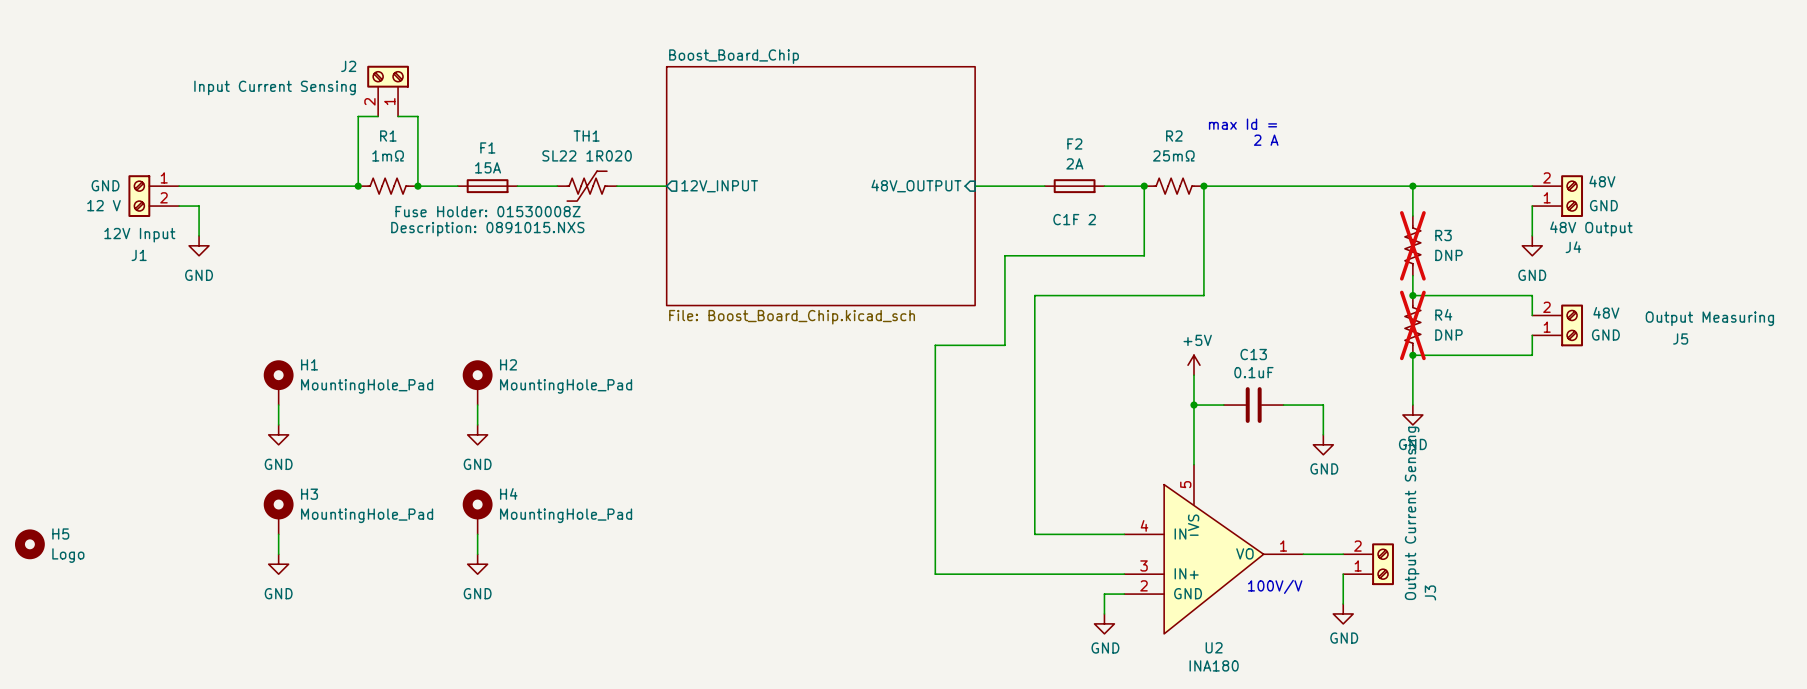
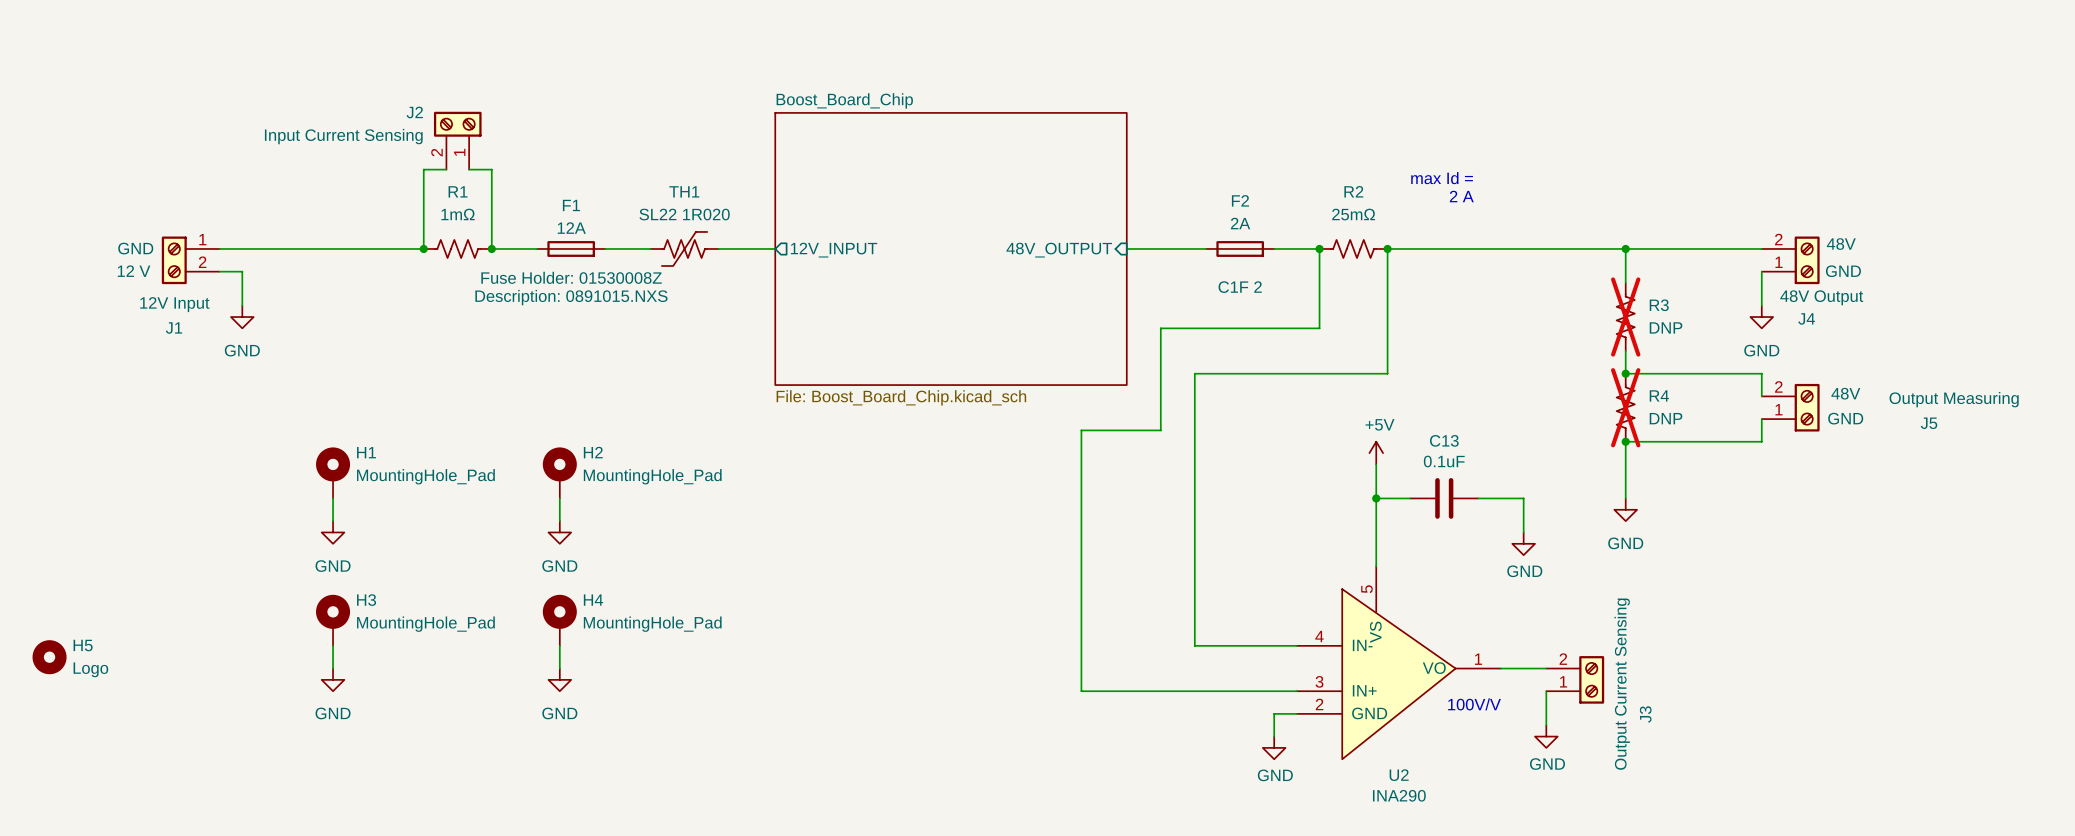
F1 value: 15A (488, 167) -> 12A (571, 228)
J3 value position: Output Current Sensing (1412, 513) -> Output Current Sensing (1622, 684)
U2 value: INA180 (1214, 665) -> INA290 (1399, 795)

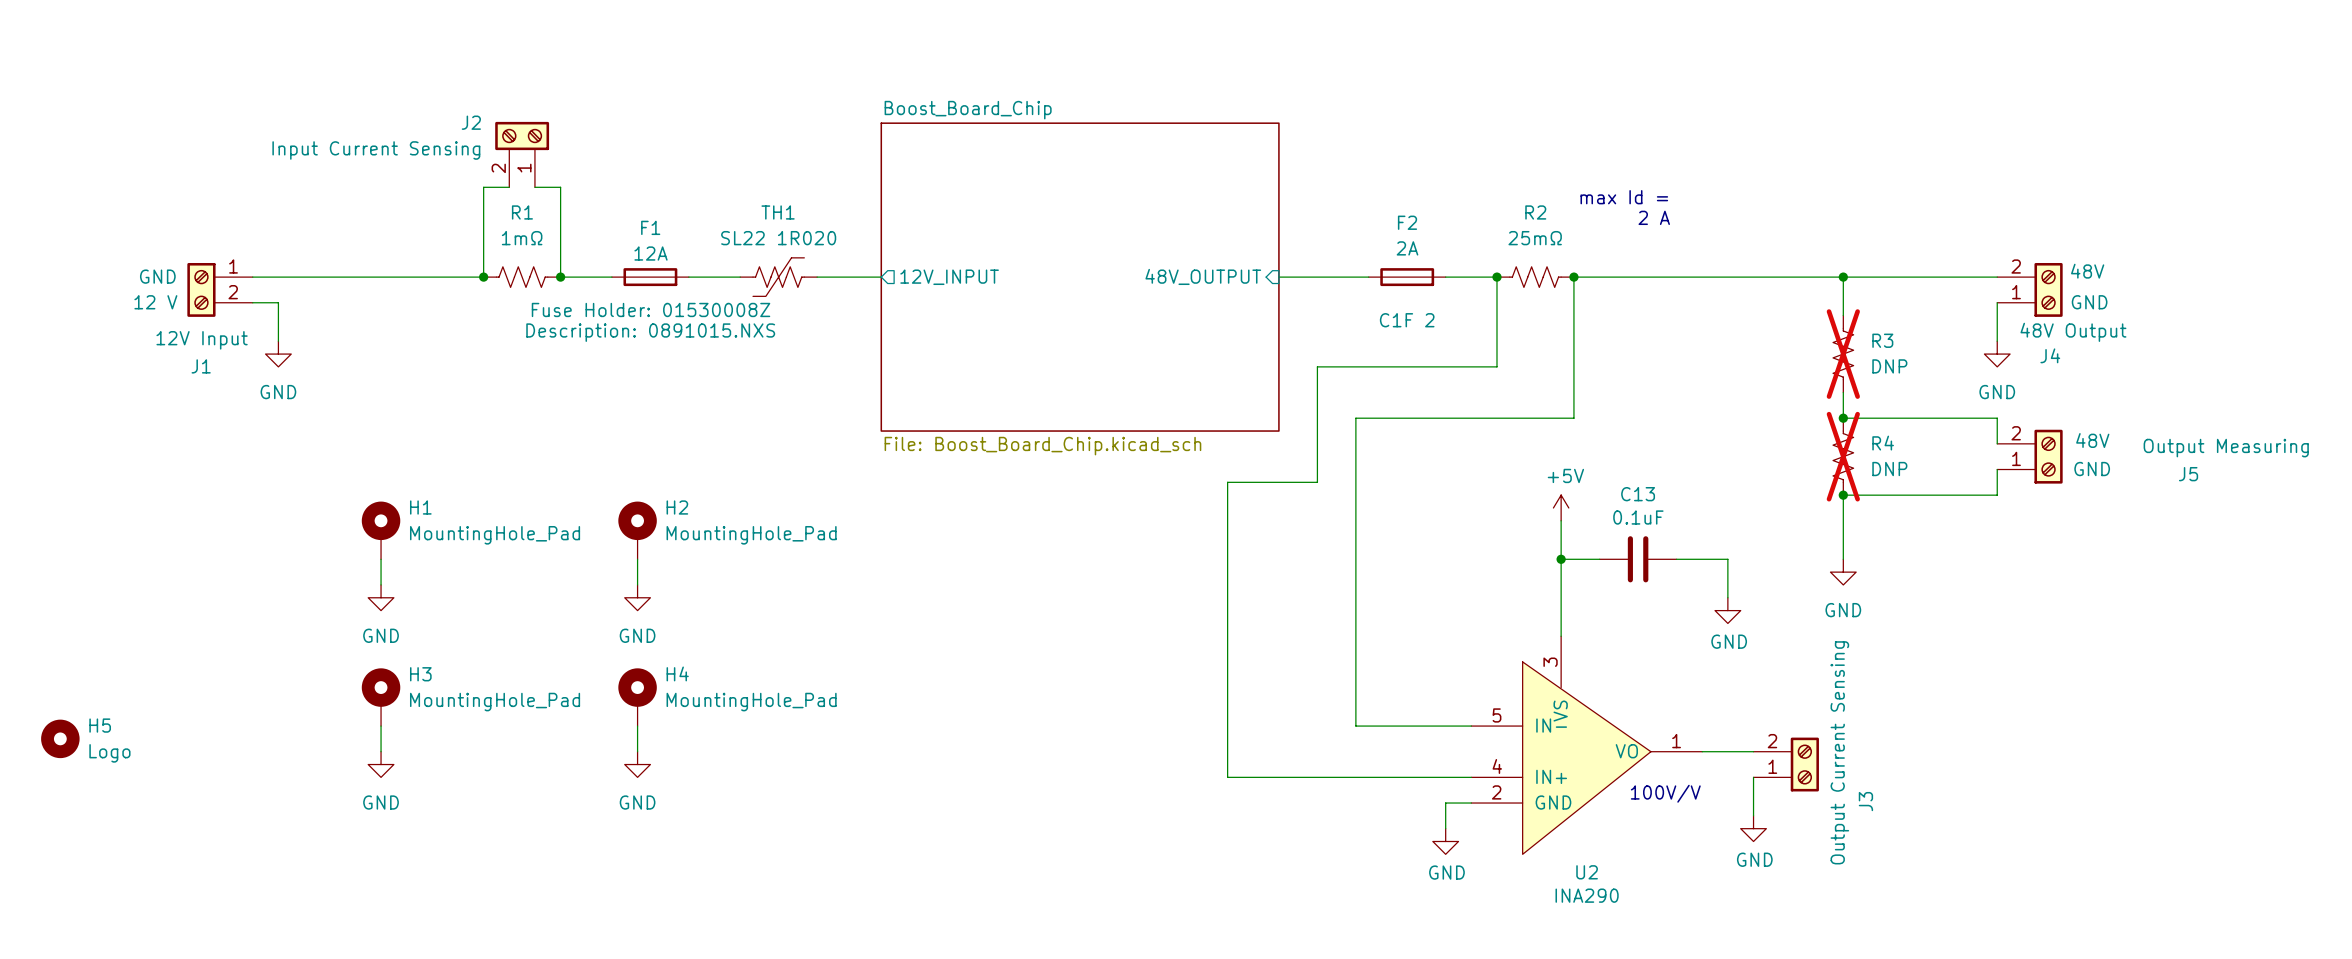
U2 pin number: 5 (1366, 589) -> 3 (1550, 662)
U2 pin number: 4 (1319, 636) -> 5 (1496, 715)
U2 pin number: 3 (1319, 681) -> 4 (1497, 766)

